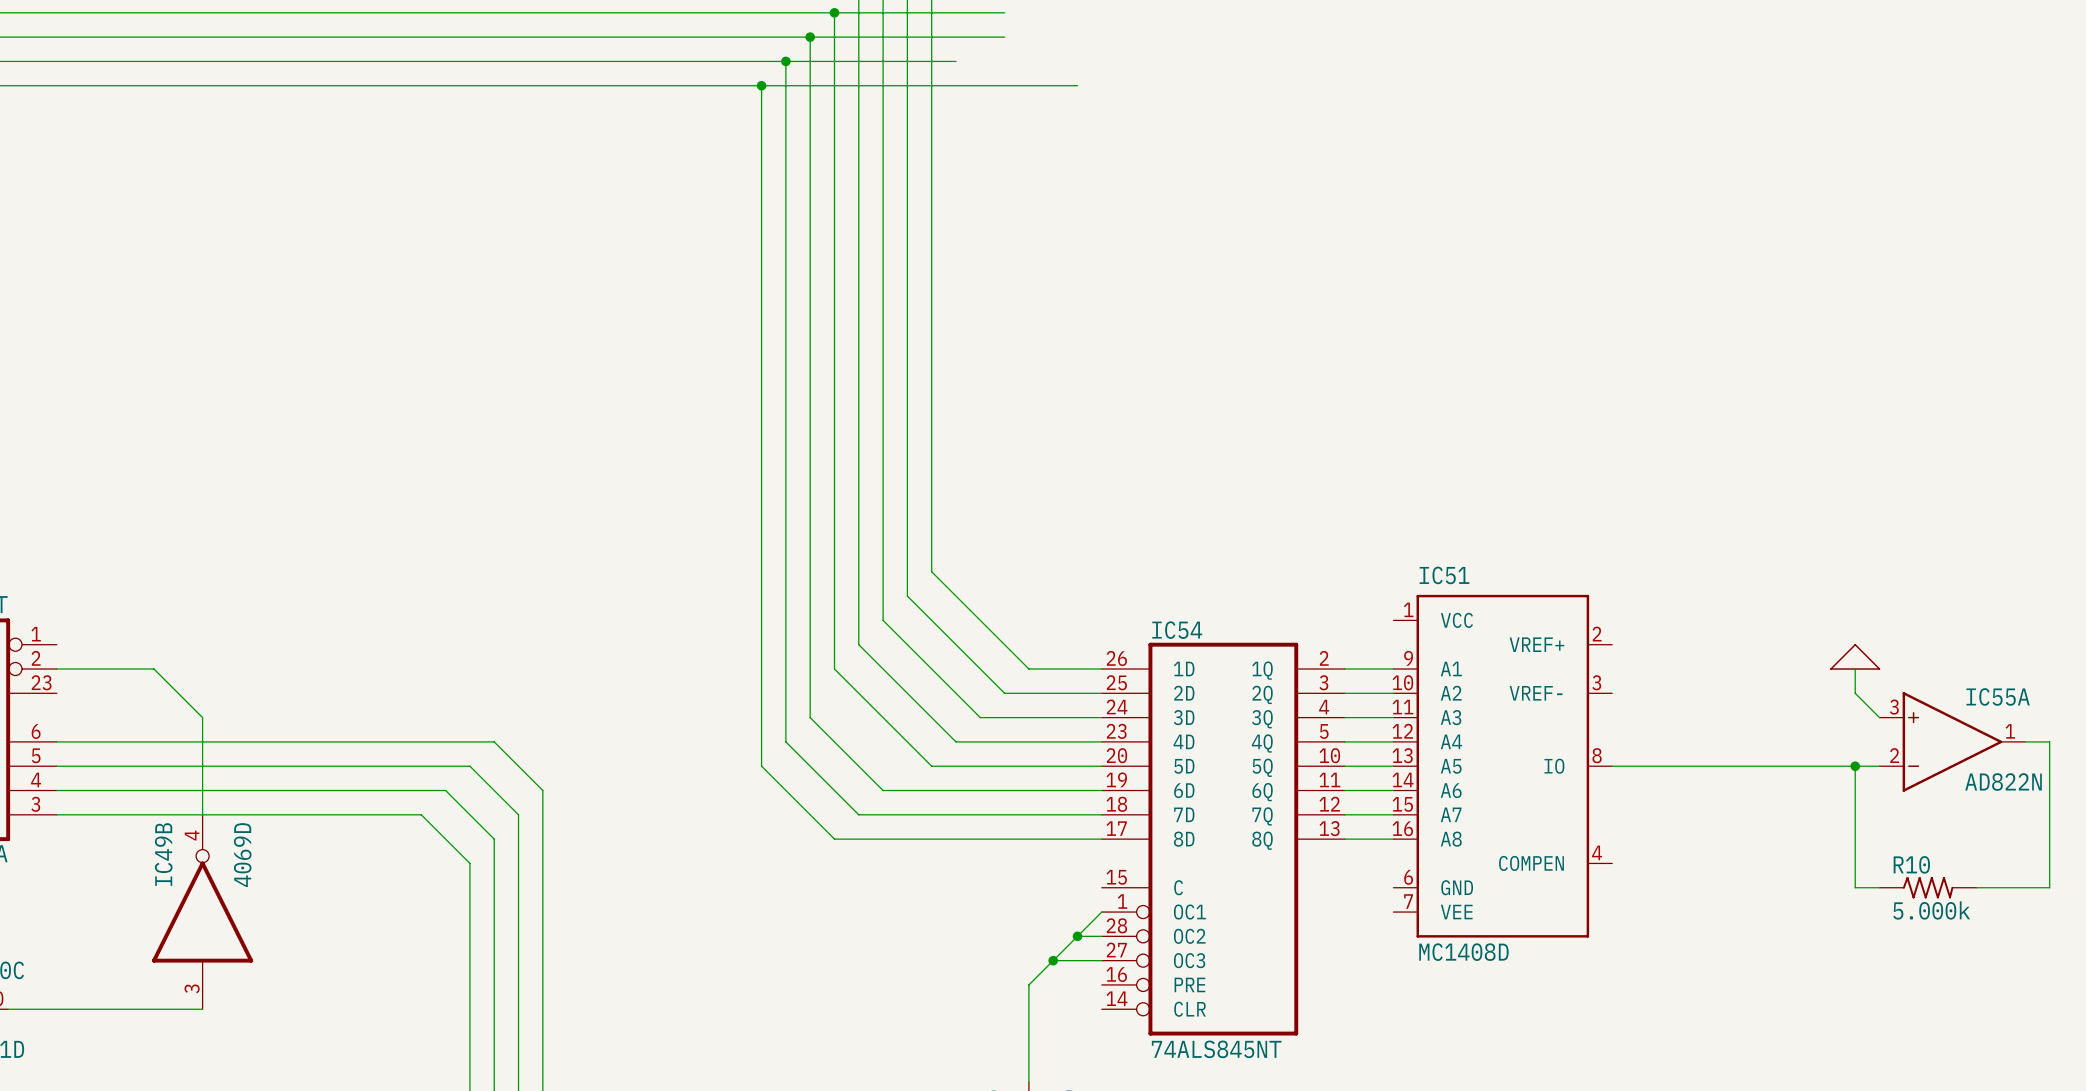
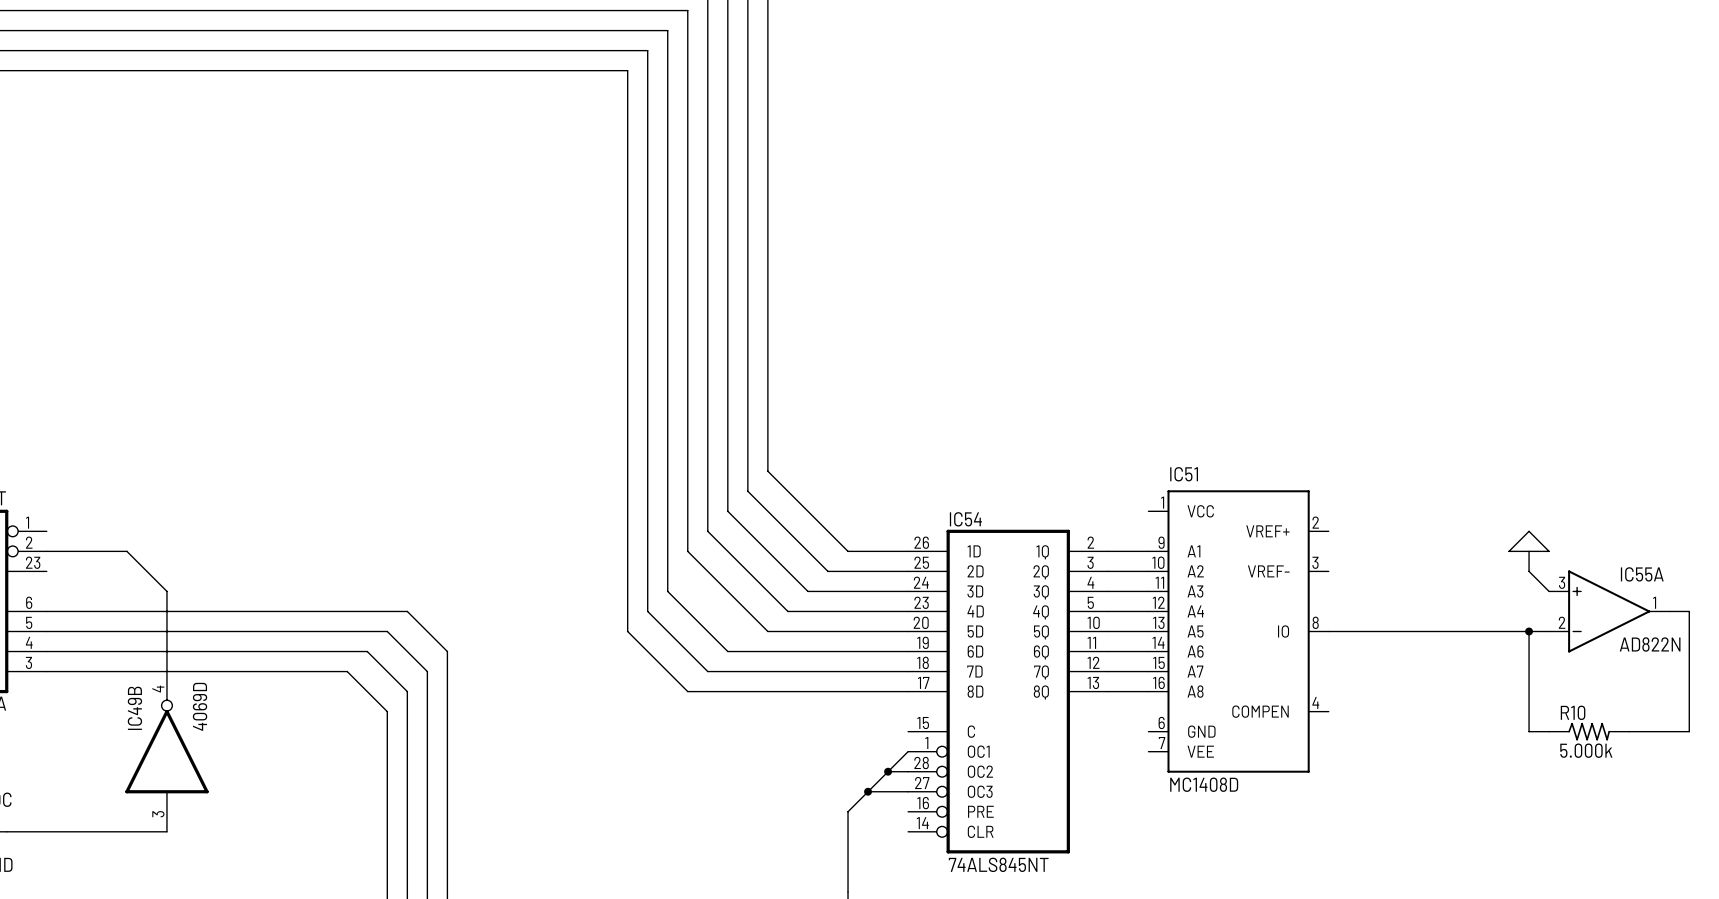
wire: (834, 12) (1004, 12) -> none
junction: (834, 12) -> none
wire: (810, 37) (1004, 37) -> none
junction: (810, 37) -> none
wire: (785, 61) (956, 61) -> none
junction: (785, 61) -> none
wire: (761, 85) (1077, 85) -> none
junction: (761, 85) -> none

